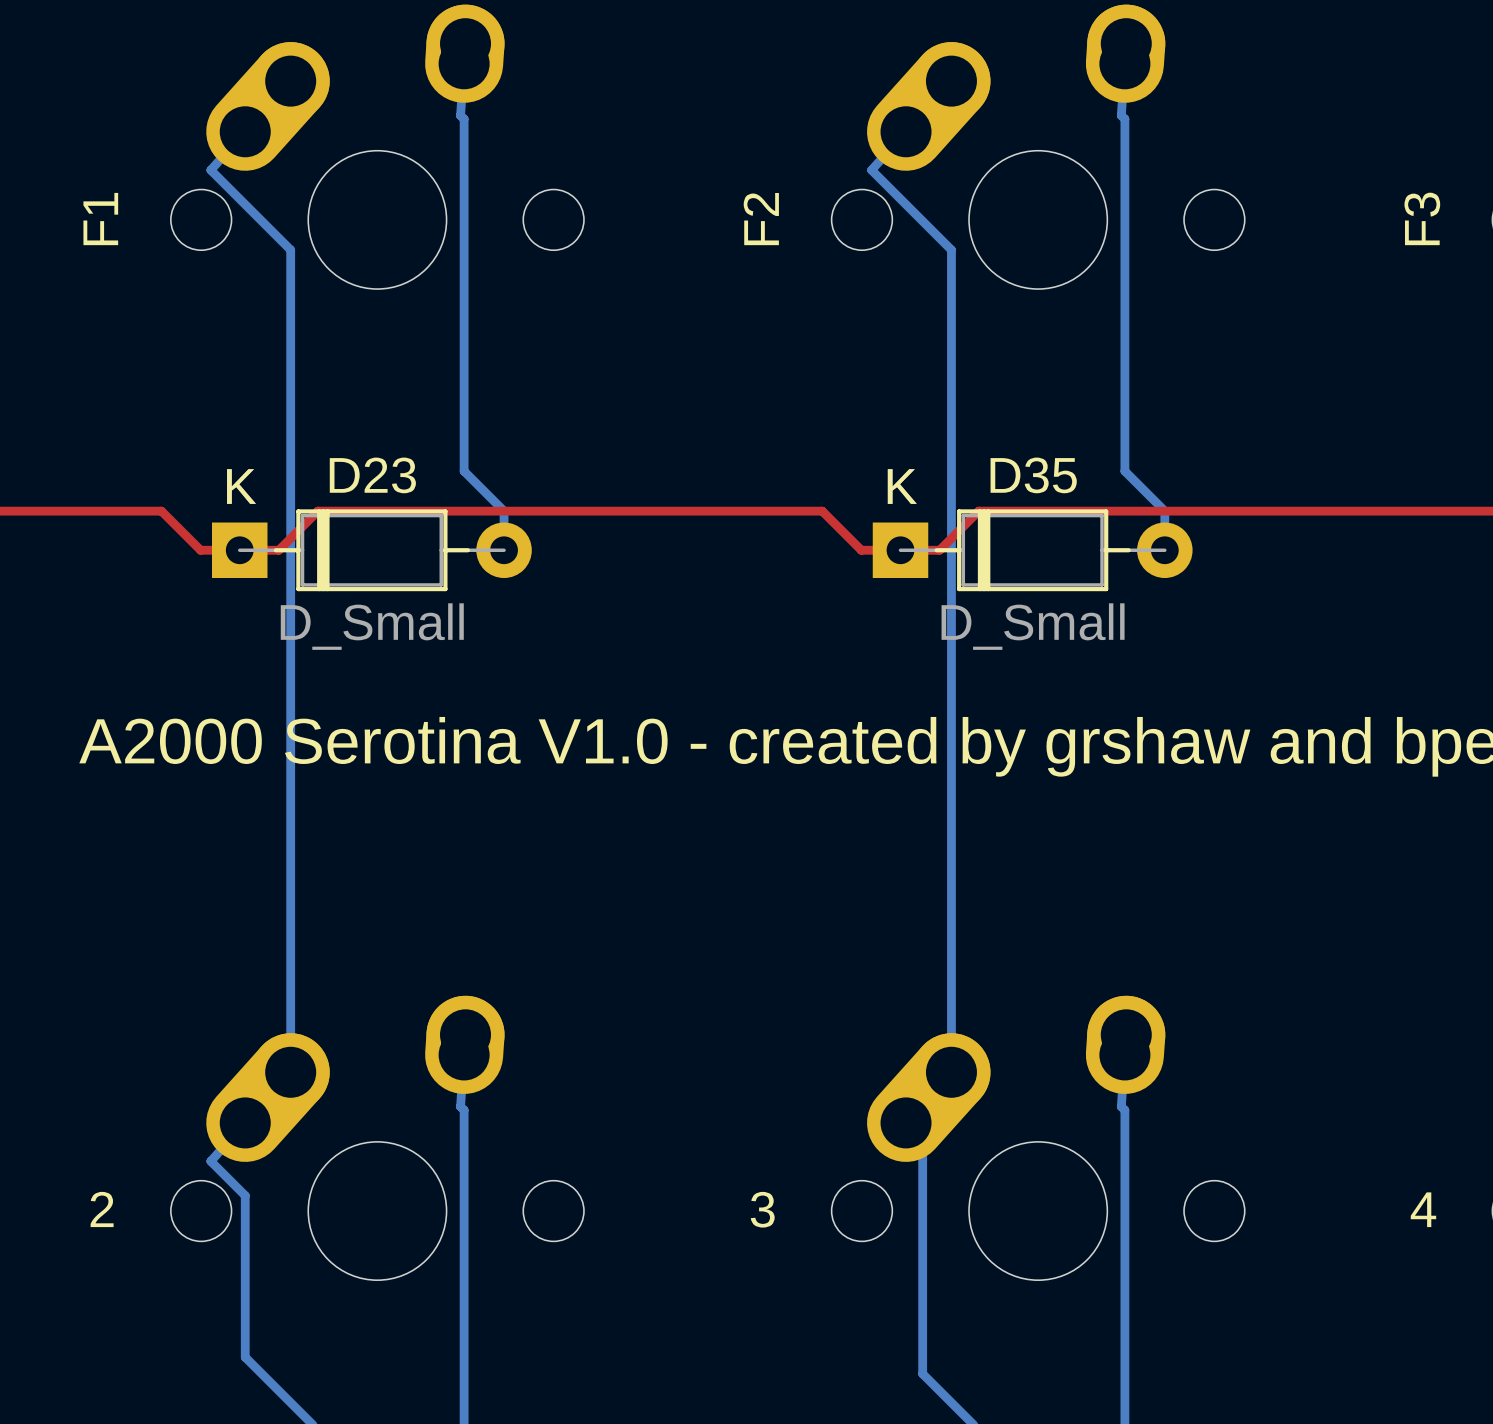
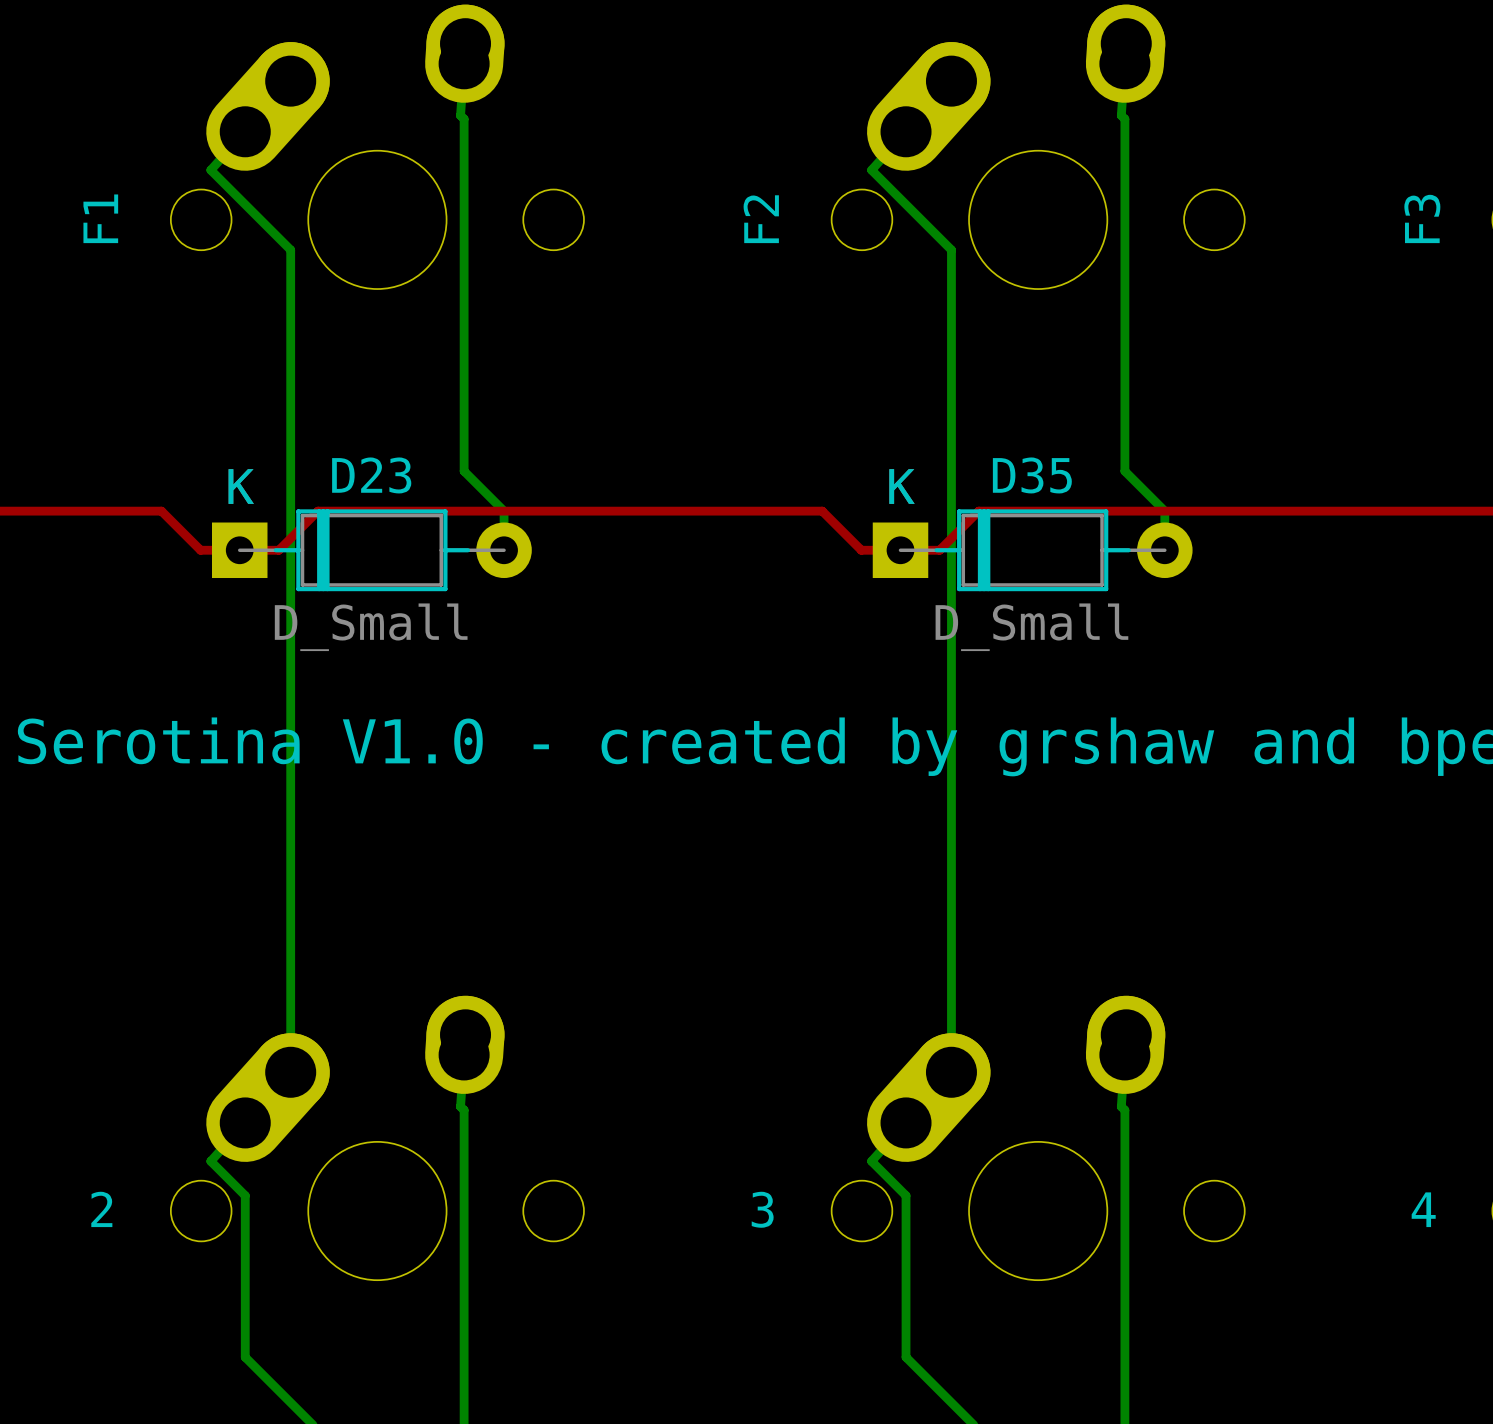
bottom track: (922, 1106) (922, 1373) -> (906, 1122) (871, 1161) (906, 1195) (906, 1357) (922, 1373)

